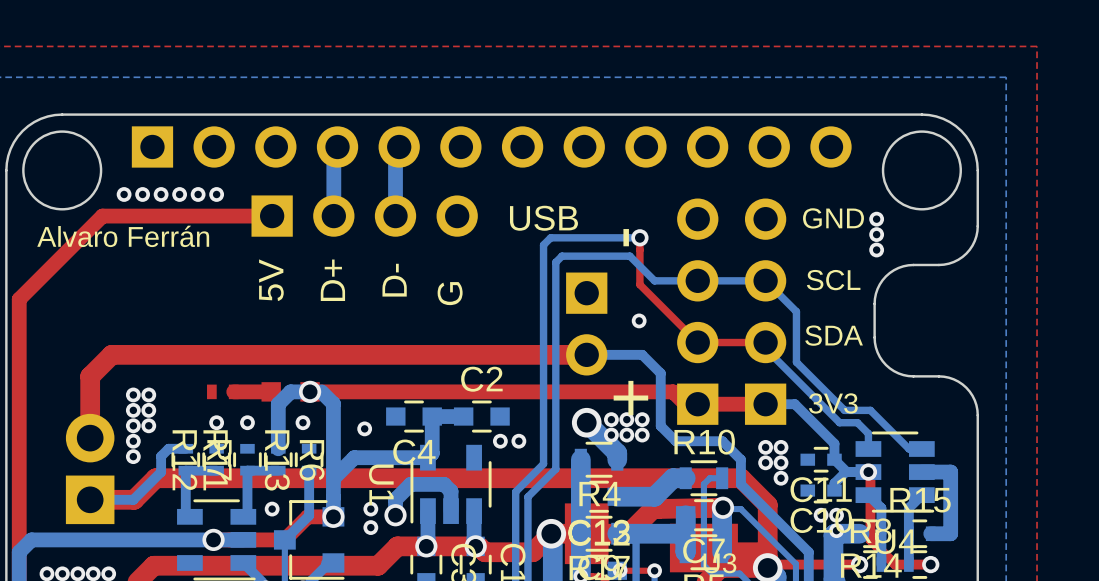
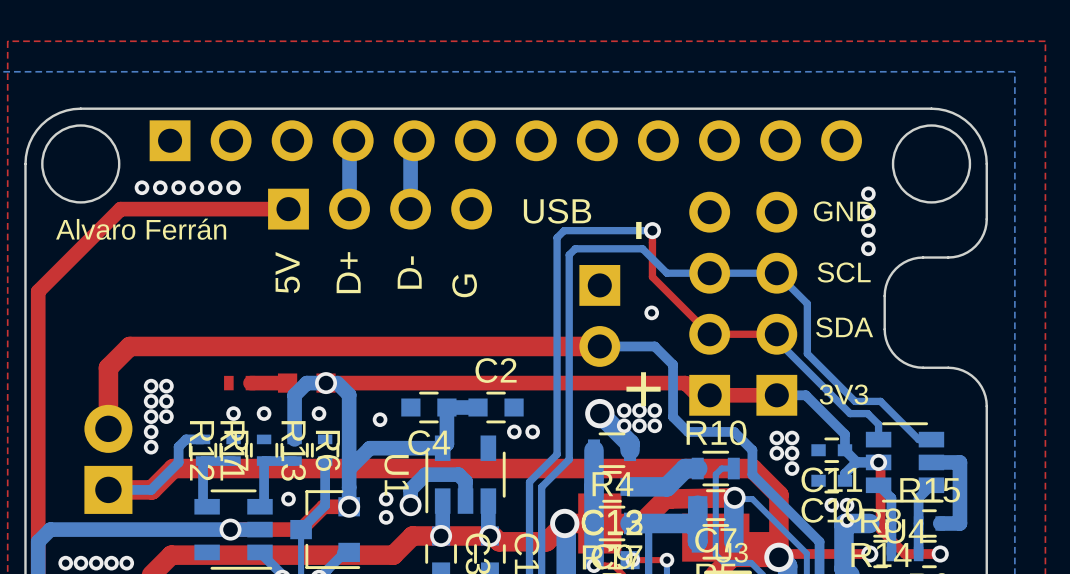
via: none -> (868, 193)
via: none -> (868, 212)
via: (876, 219) -> none
via: (876, 234) -> none
via: none -> (868, 230)
via: (876, 250) -> none
via: none -> (868, 248)

